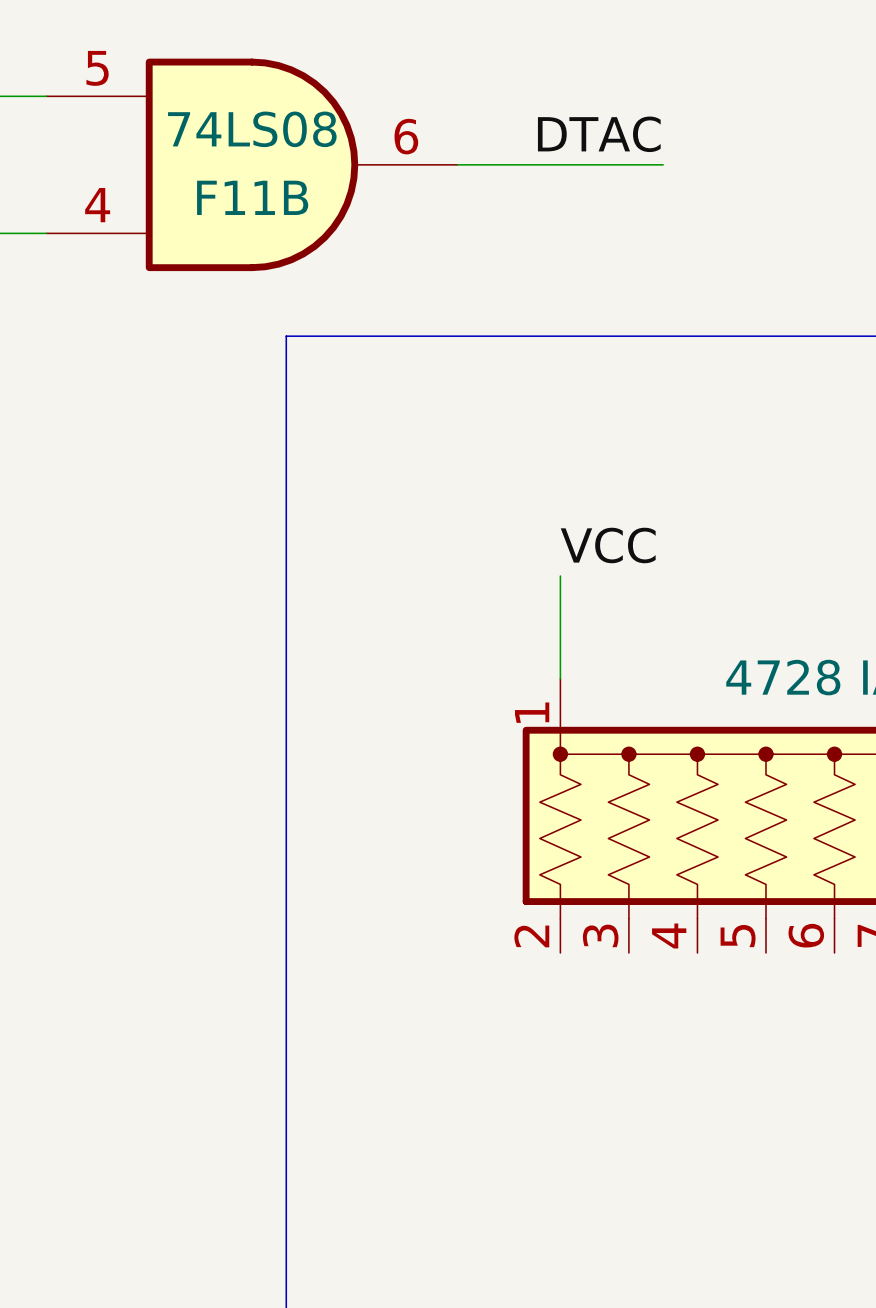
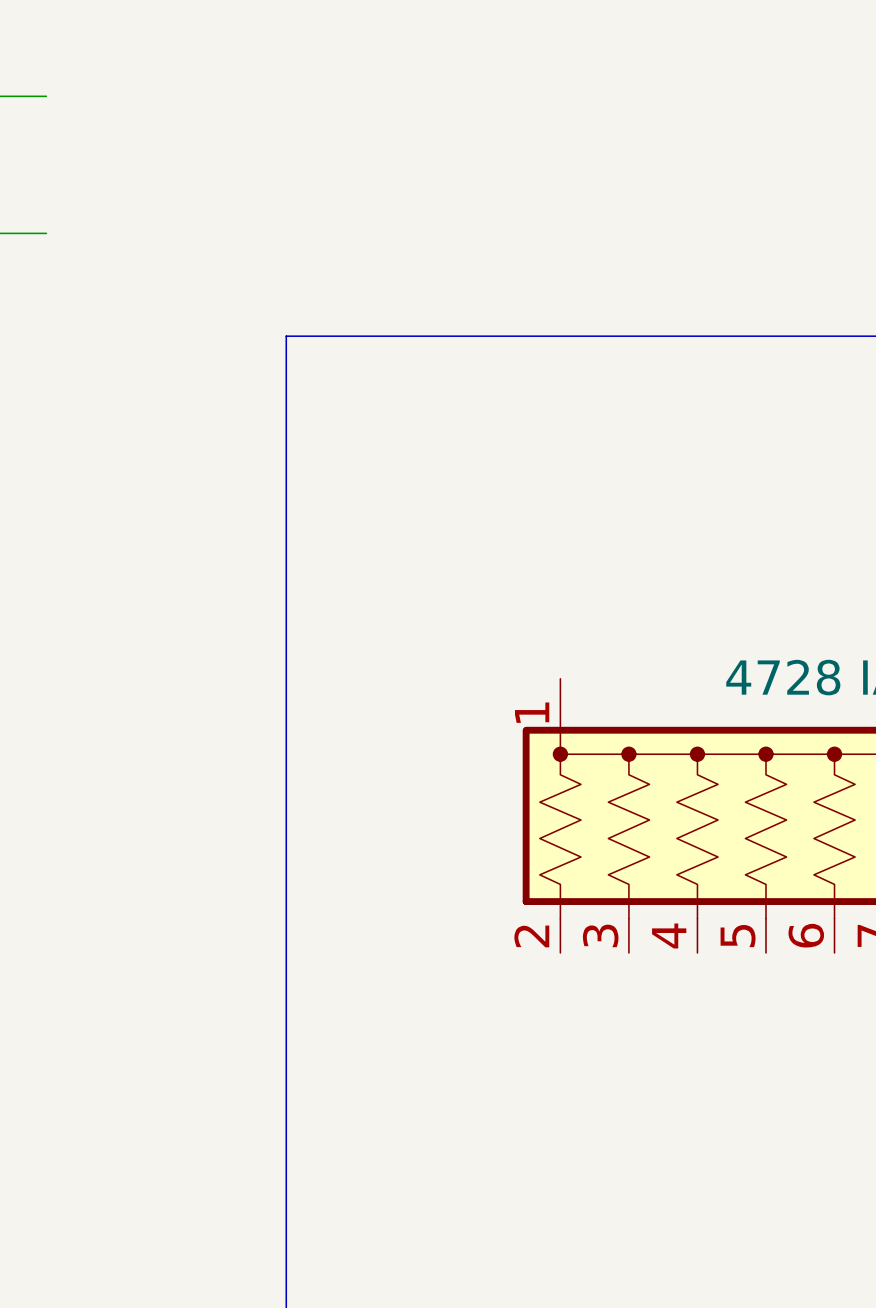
label: DTAC (599, 134) -> none
F11B: 74LS08 (252, 164) -> none
wire: (457, 164) (663, 164) -> none
label: VCC (608, 545) -> none
wire: (560, 576) (560, 678) -> none

